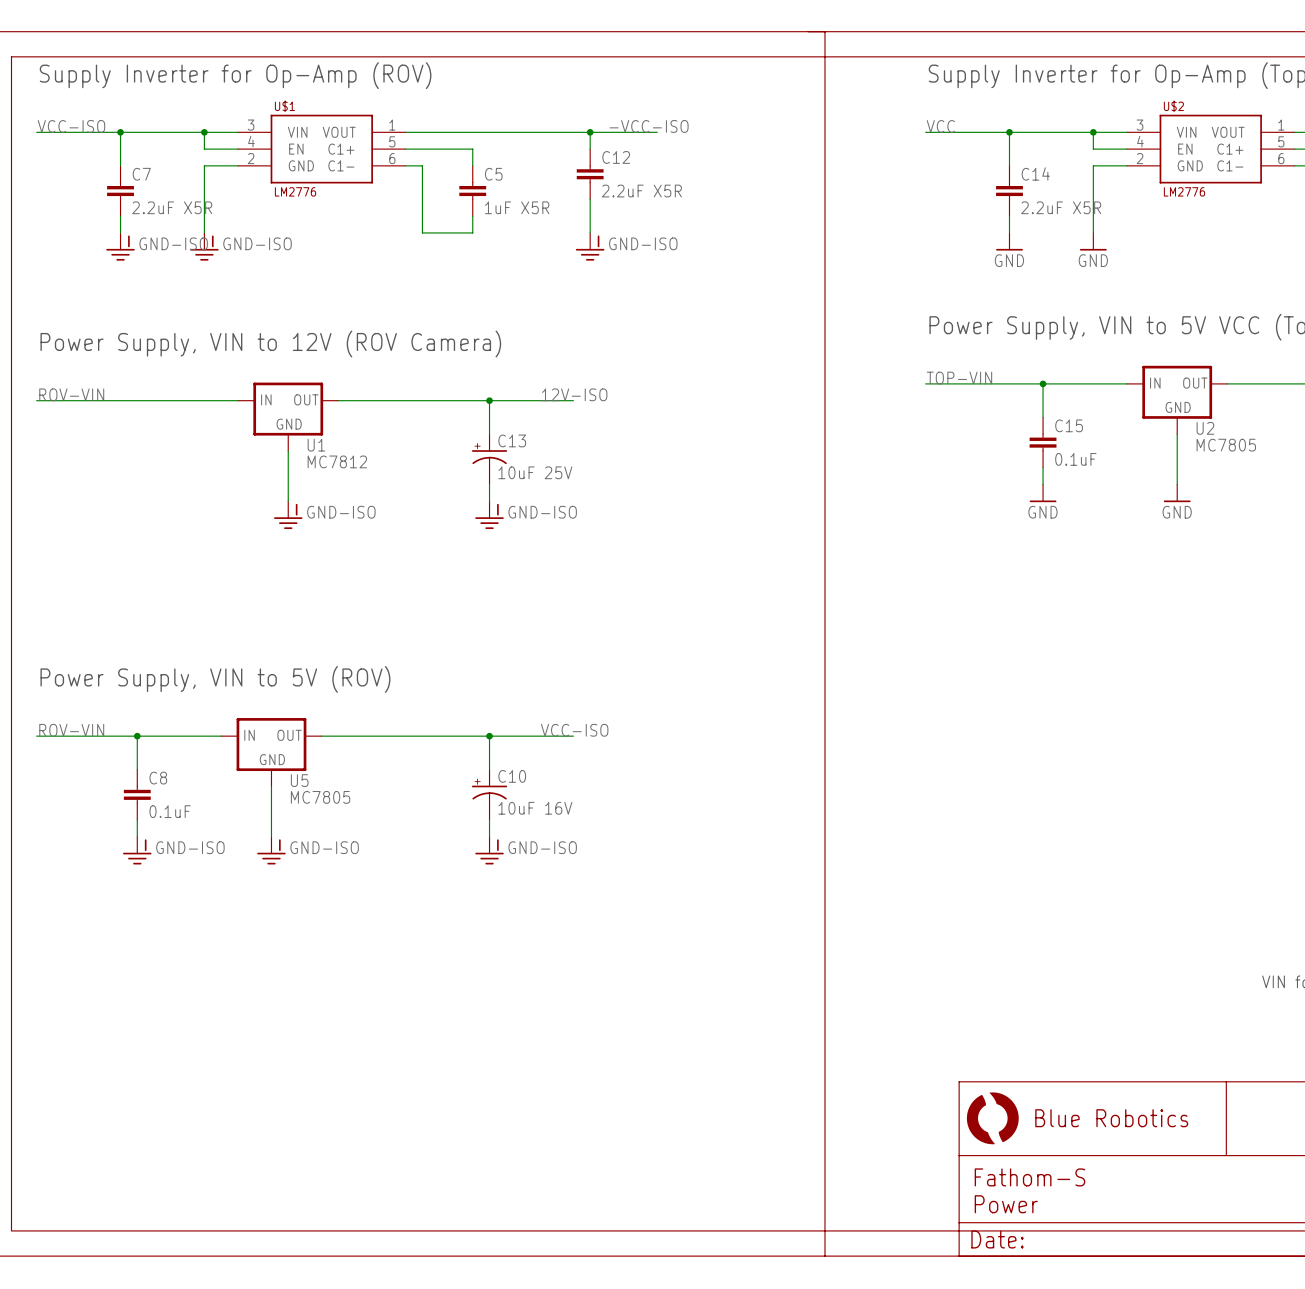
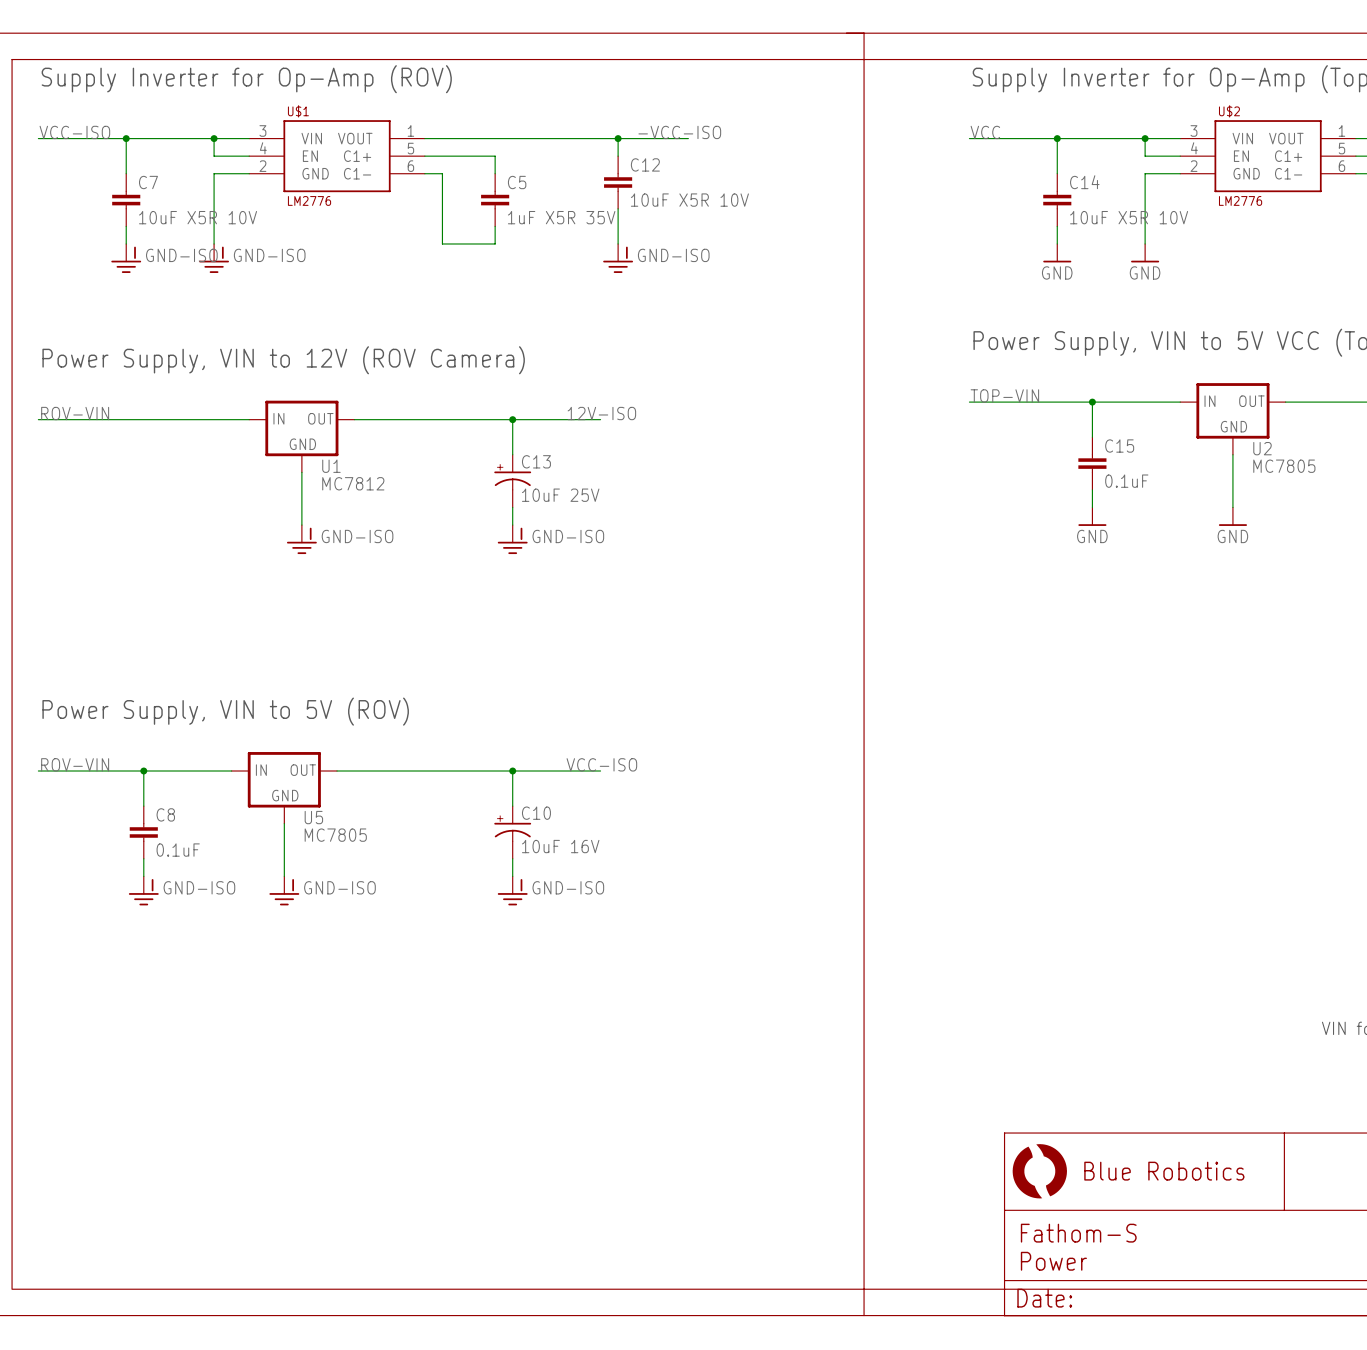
C12 value: 2.2uF X5R (641, 191) -> 10uF X5R 10V (689, 200)
C7 value: 2.2uF X5R (172, 207) -> 10uF X5R 10V (198, 217)
C5 value: 1uF X5R (517, 207) -> 1uF X5R 35V (561, 217)
C14 value: 2.2uF X5R (1061, 207) -> 10uF X5R 10V (1129, 217)

